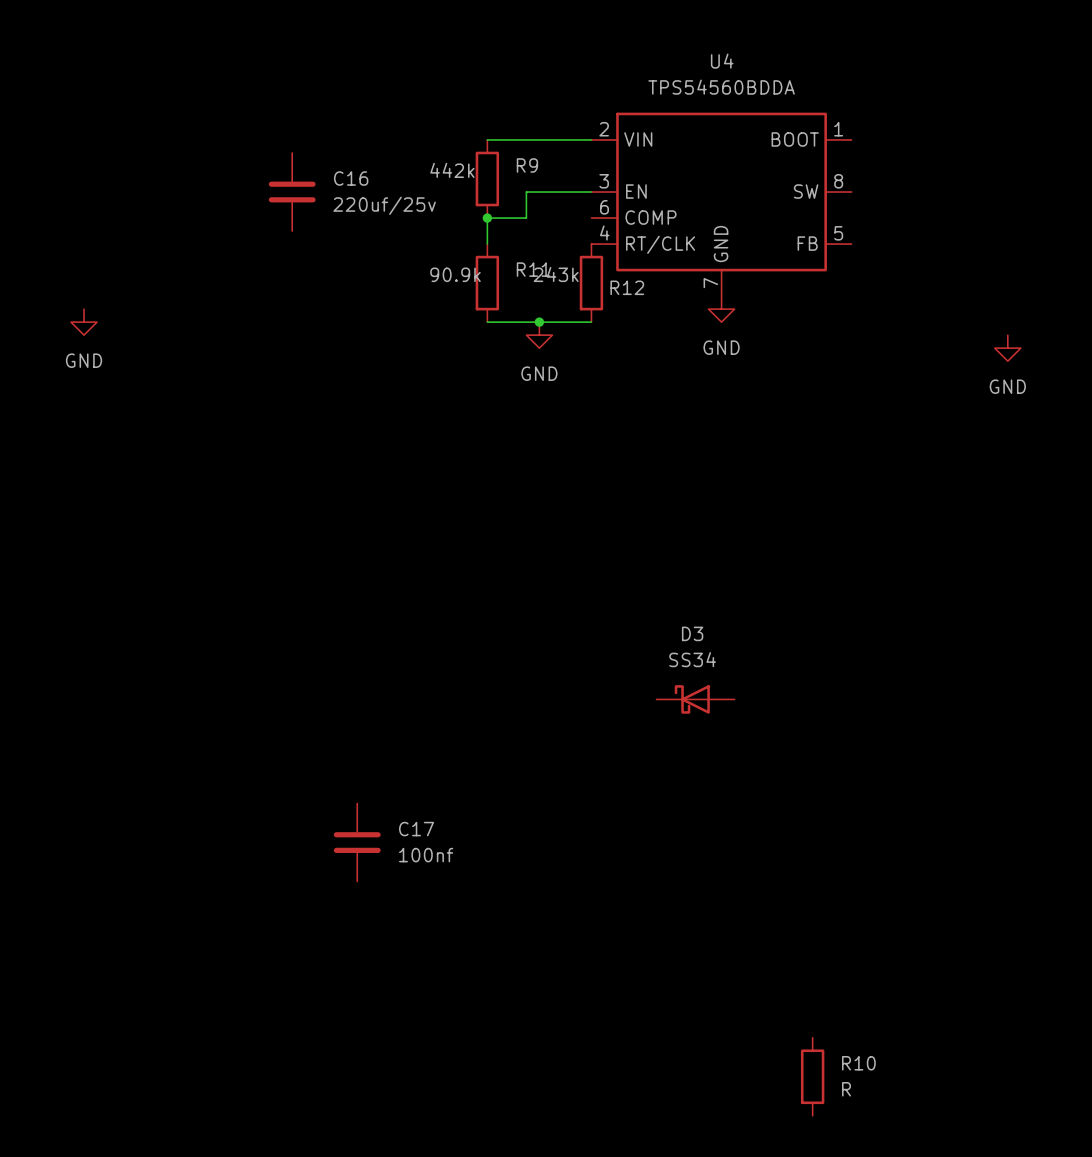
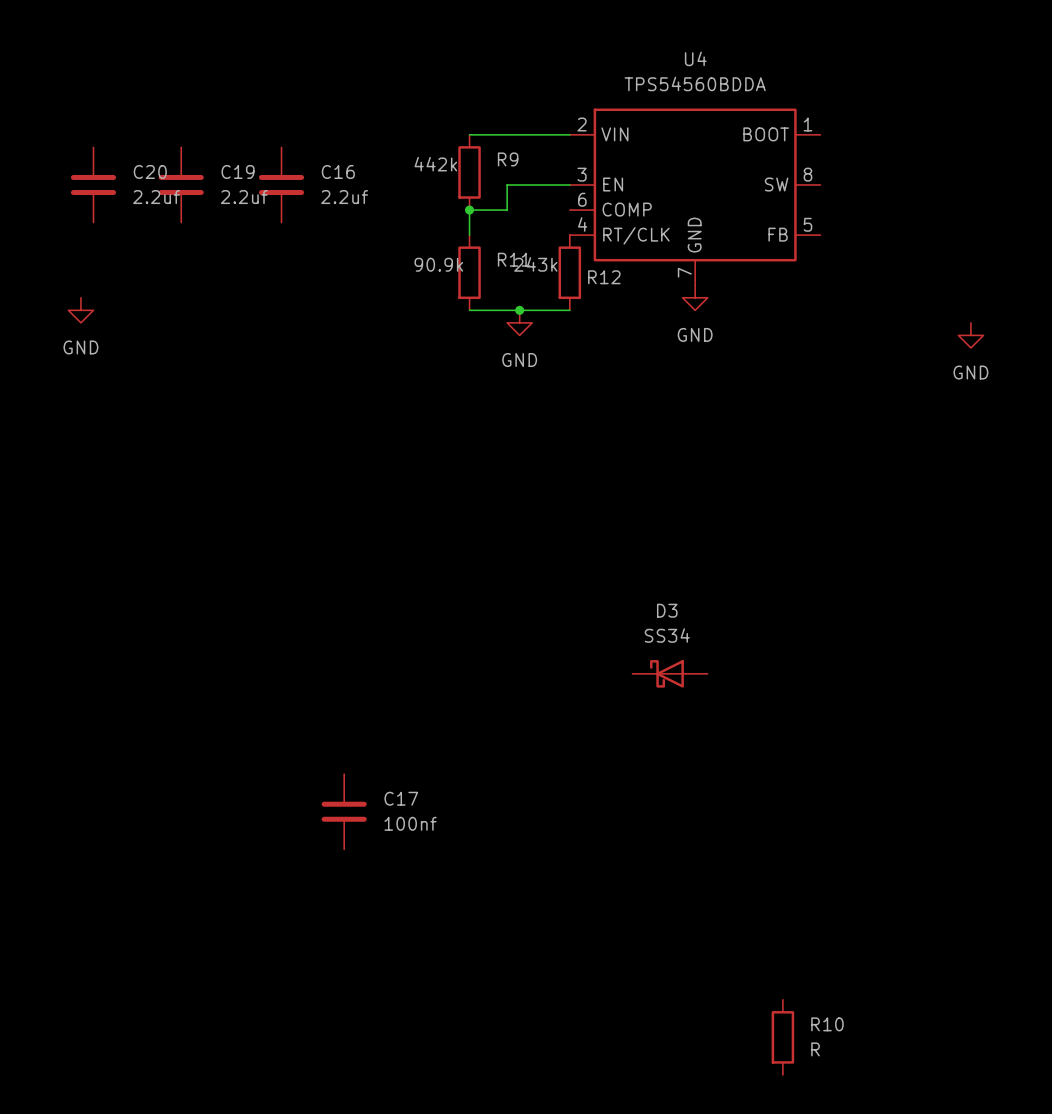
C20: none -> 2.2uf (93, 184)
C19: none -> 2.2uf (181, 184)
C16 value: 220uf/25v (384, 205) -> 2.2uf (344, 197)

